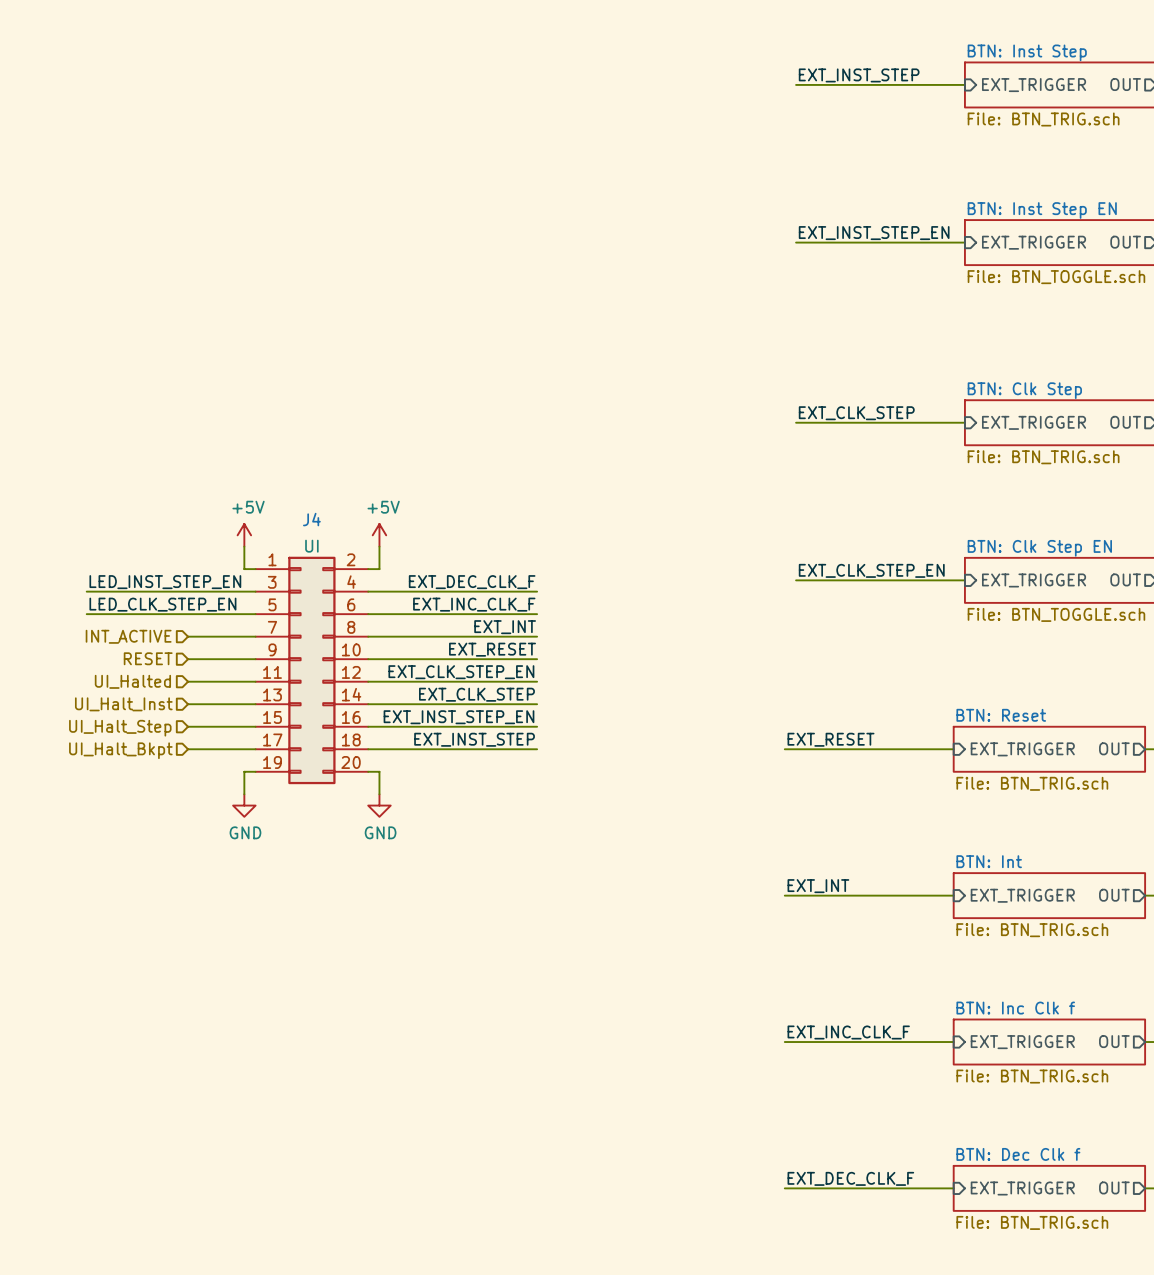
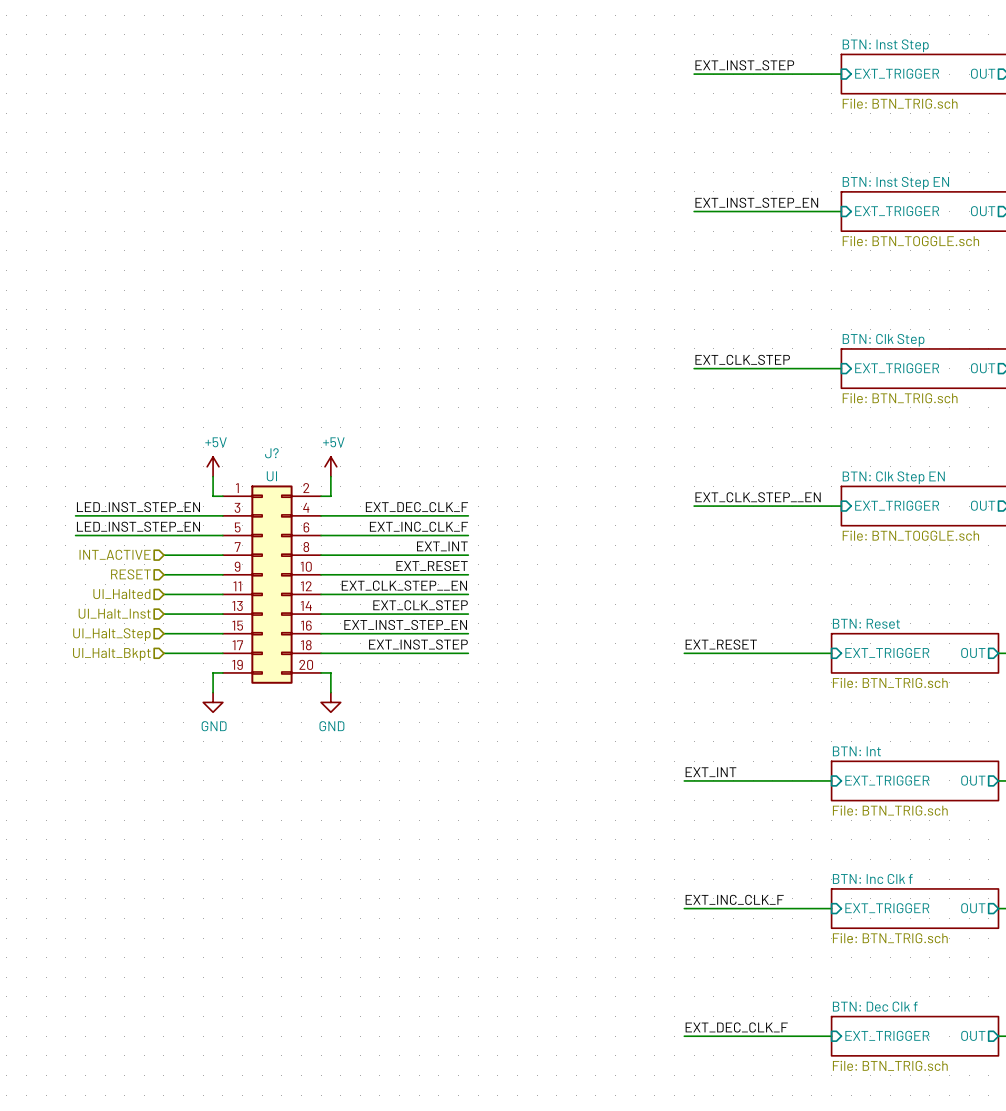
J4 name: J4 (311, 519) -> J? (271, 453)
label: EXT_CLK_STEP_EN (871, 570) -> EXT_CLK_STEP__EN (758, 497)
label: LED_CLK_STEP_EN (162, 604) -> LED_INST_STEP_EN (138, 526)
label: EXT_CLK_STEP_EN (461, 672) -> EXT_CLK_STEP__EN (404, 585)

